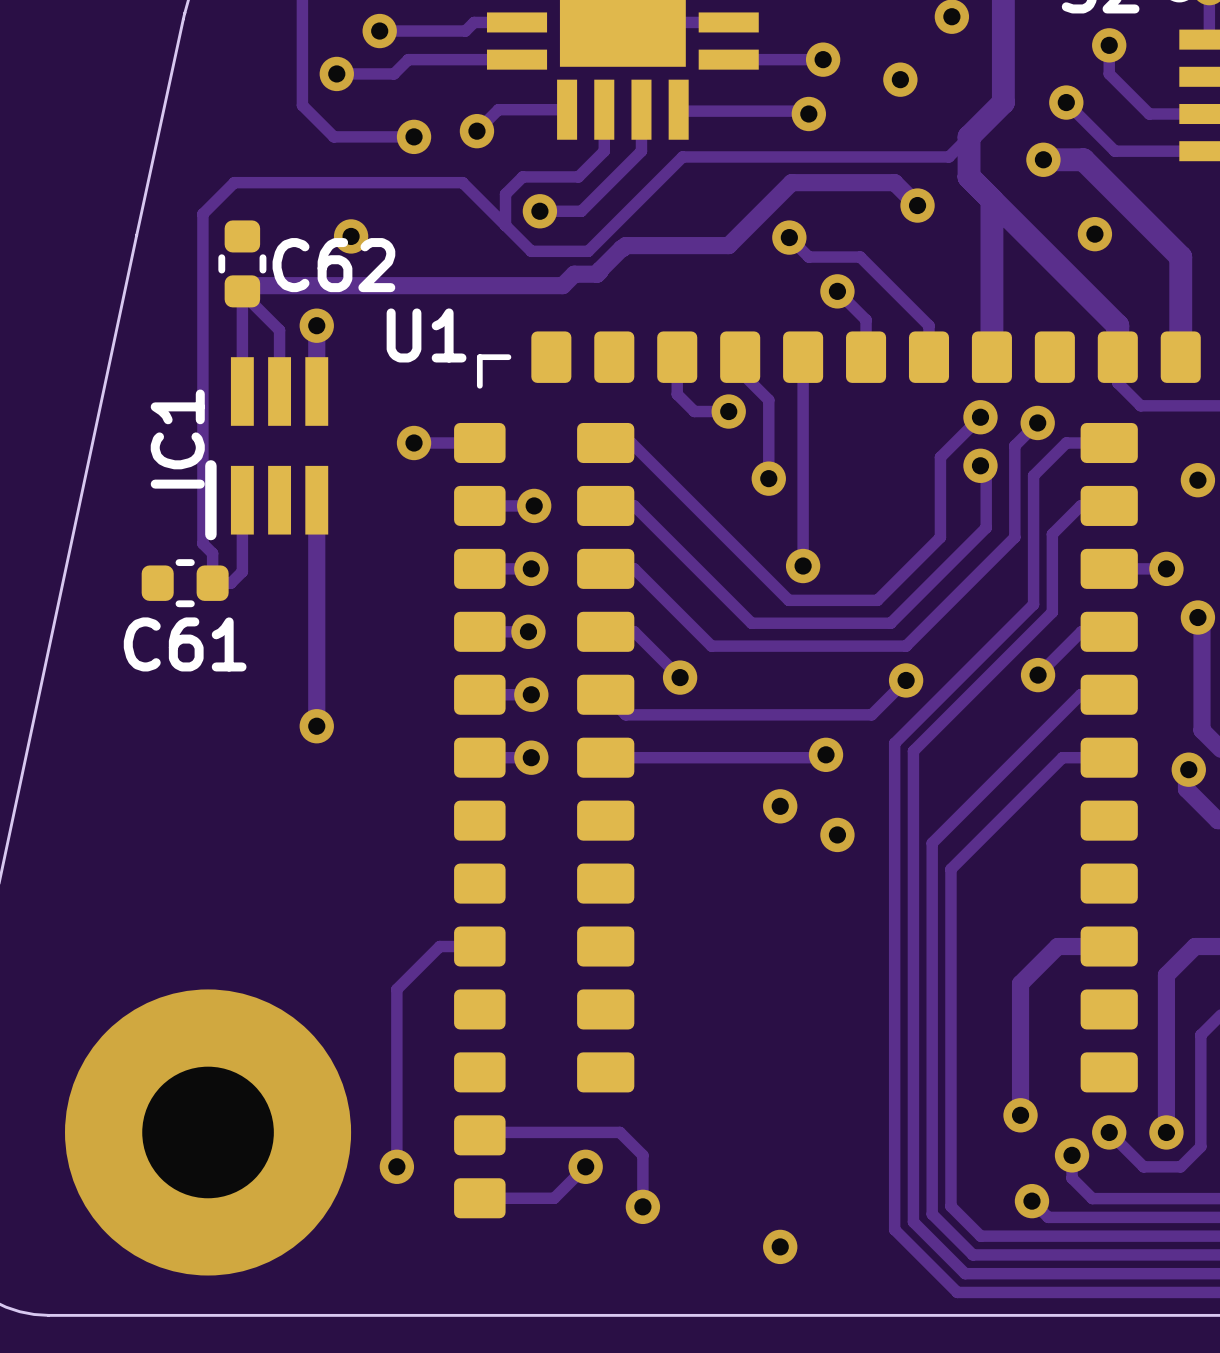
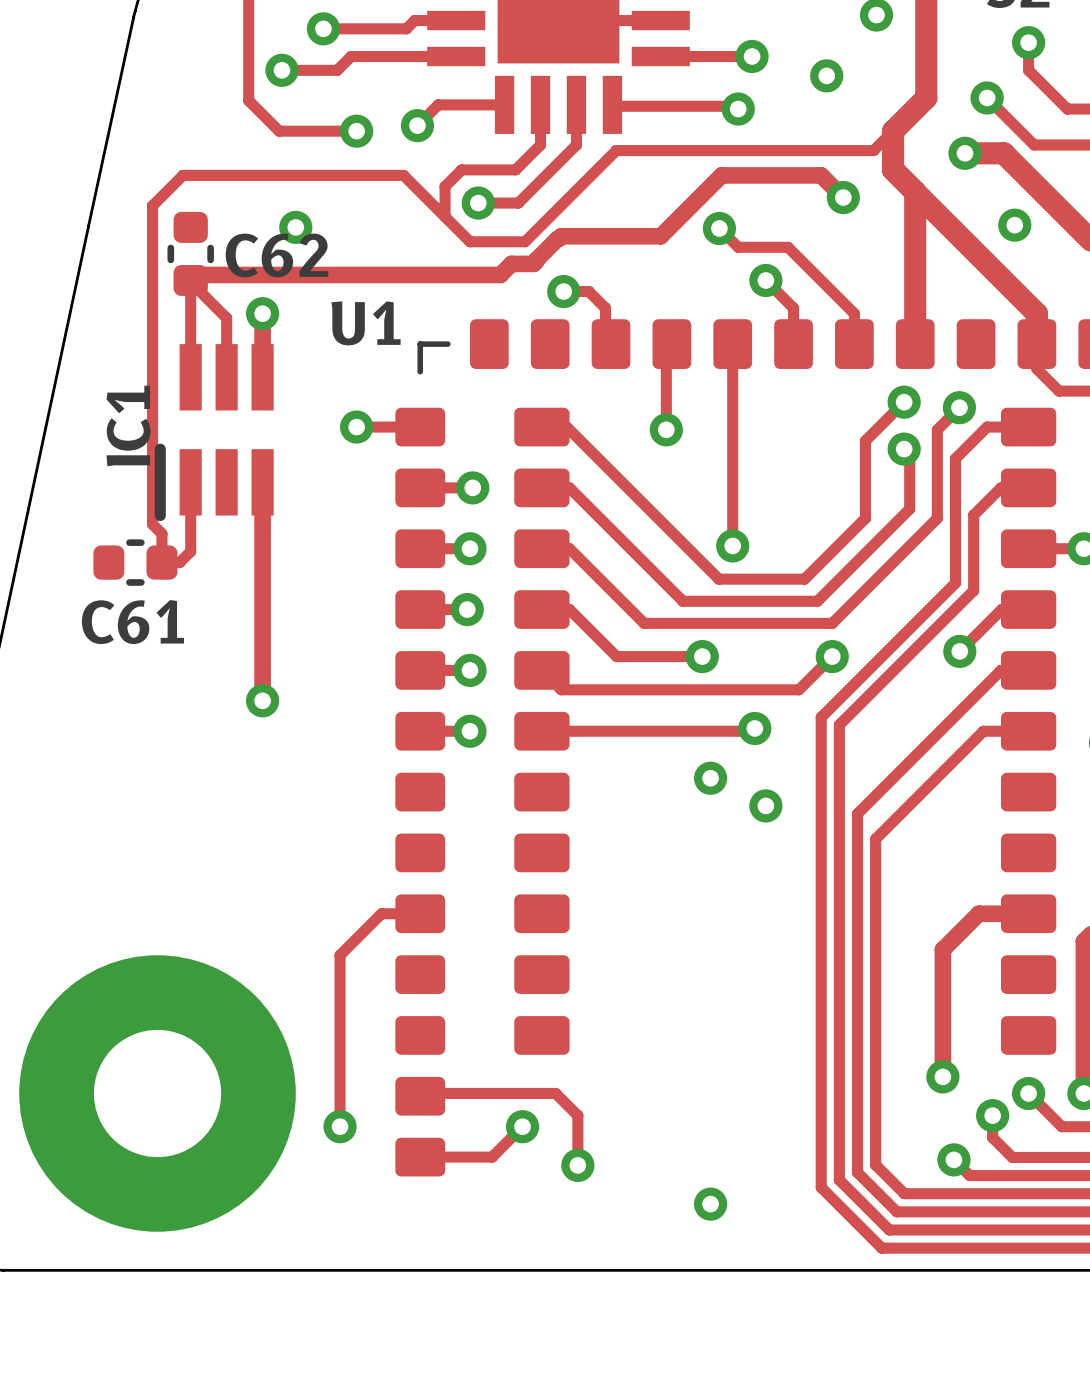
via: none -> (563, 291)
track: (677, 357) (677, 394) (694, 411) (728, 411) -> (611, 344) (605, 338) (605, 308) (588, 291) (563, 291)
track: (740, 357) (740, 371) (768, 400) (768, 478) -> (671, 344) (666, 349) (666, 429)
via: (728, 411) -> none
via: none -> (666, 429)
via: (768, 478) -> none
track: none -> (613, 653) (616, 656) (702, 656)
via position: (680, 677) -> (702, 656)

